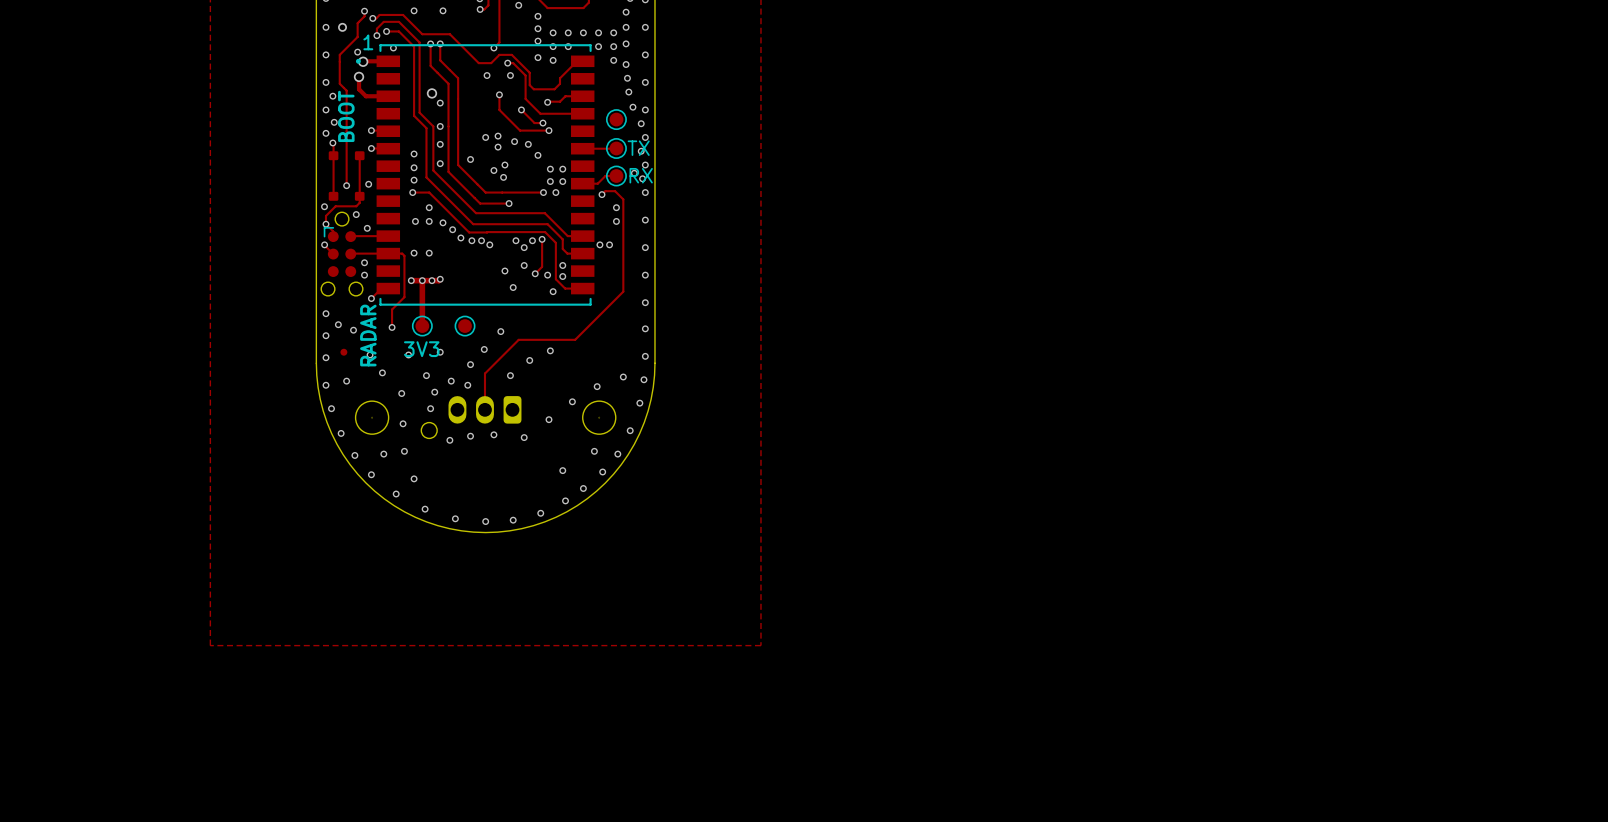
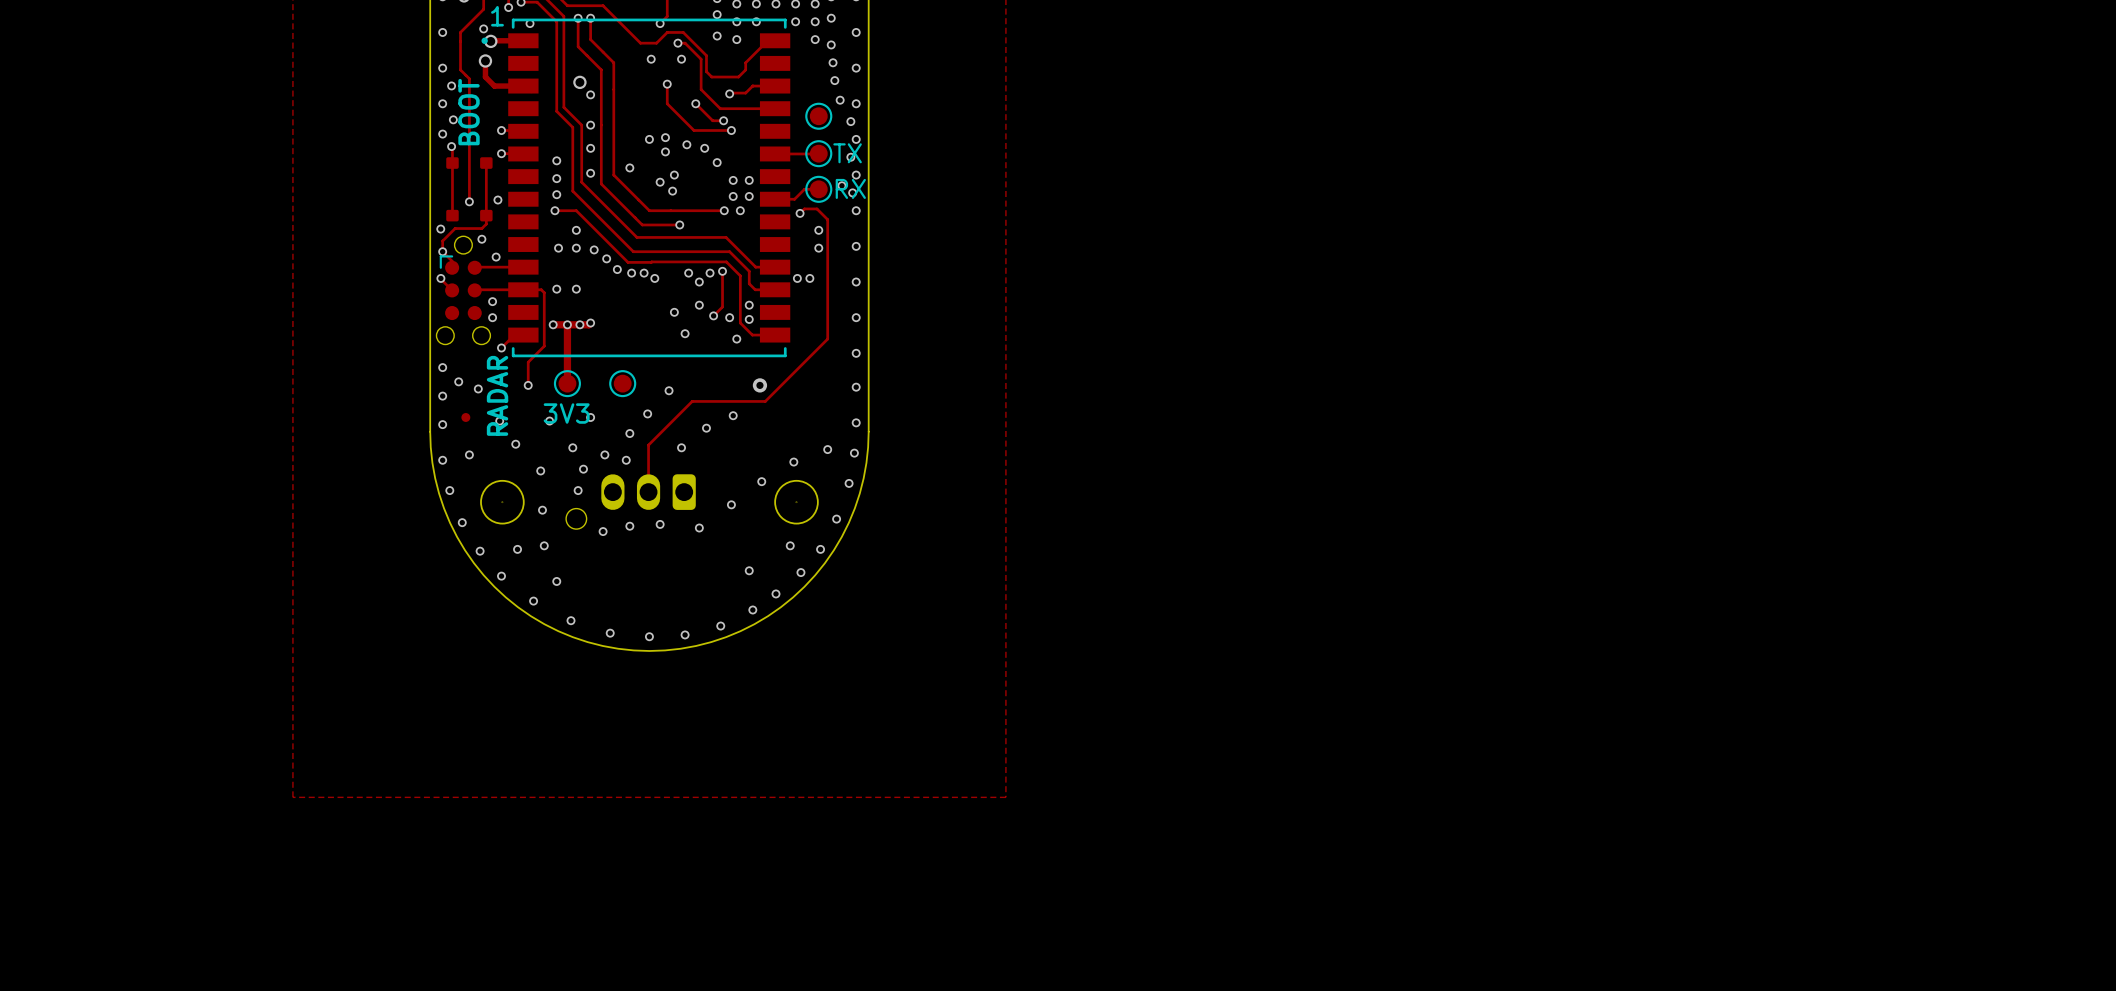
via: none -> (759, 385)

